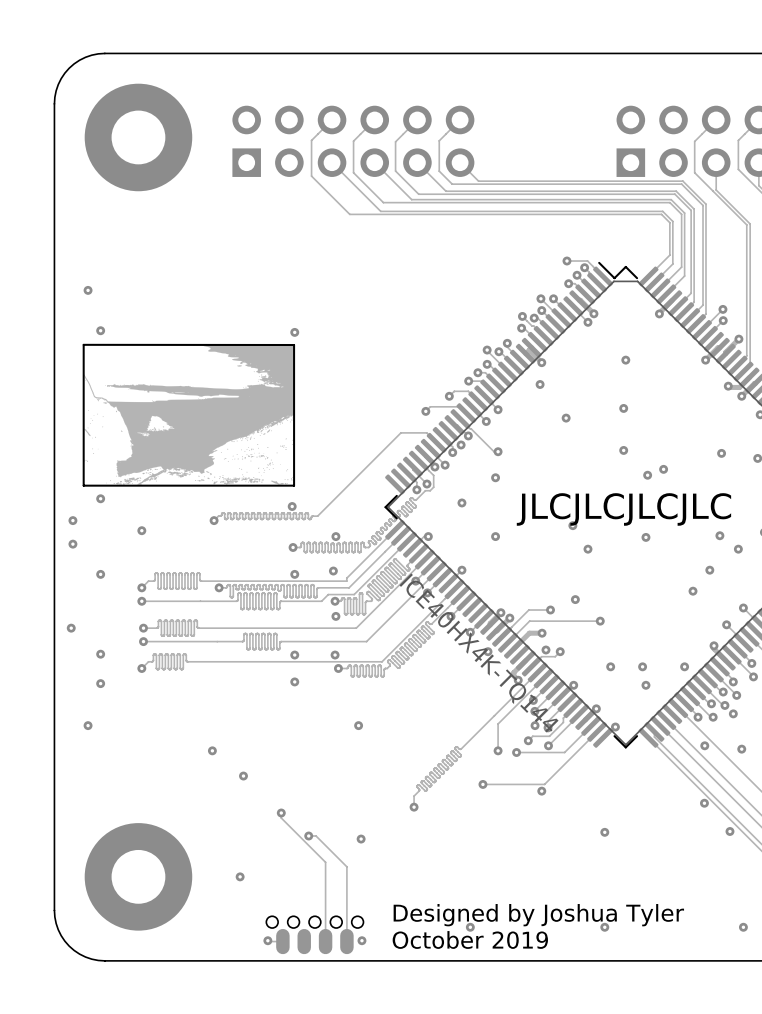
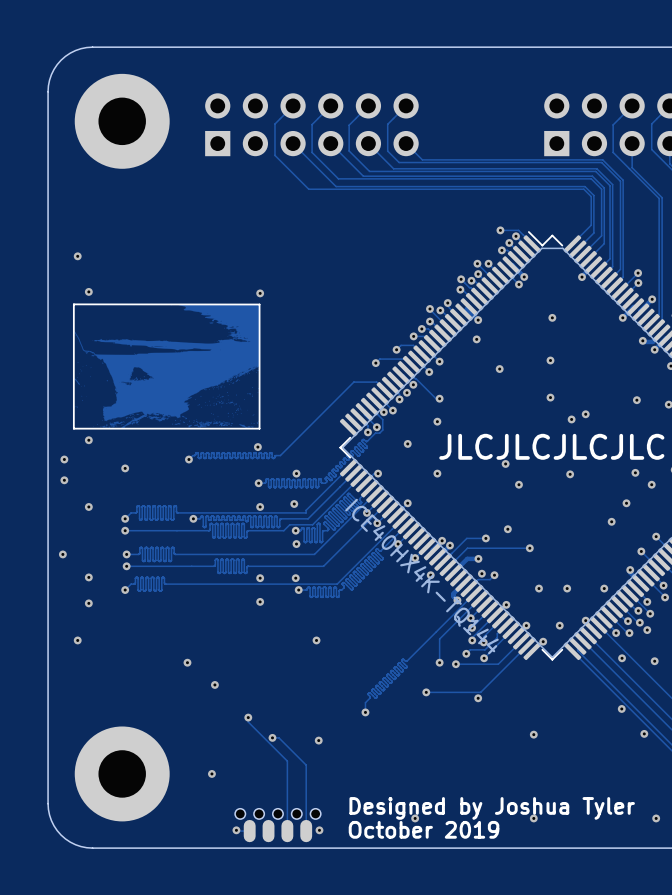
via: (645, 685) -> none
via: none -> (585, 620)
via: none -> (559, 625)

